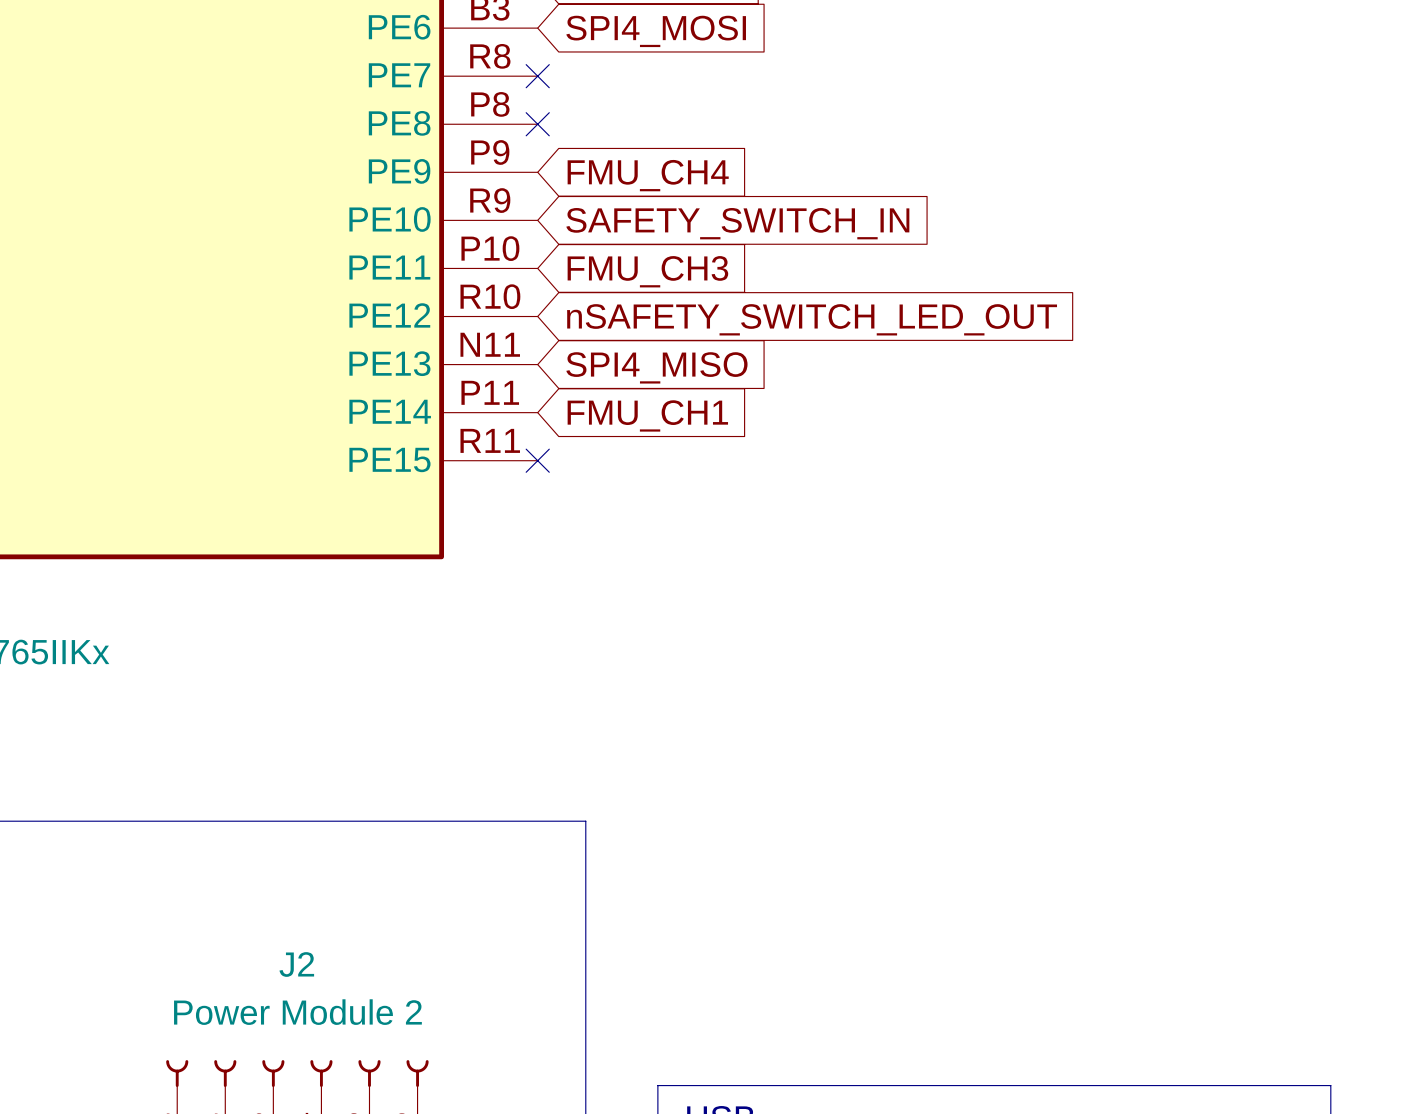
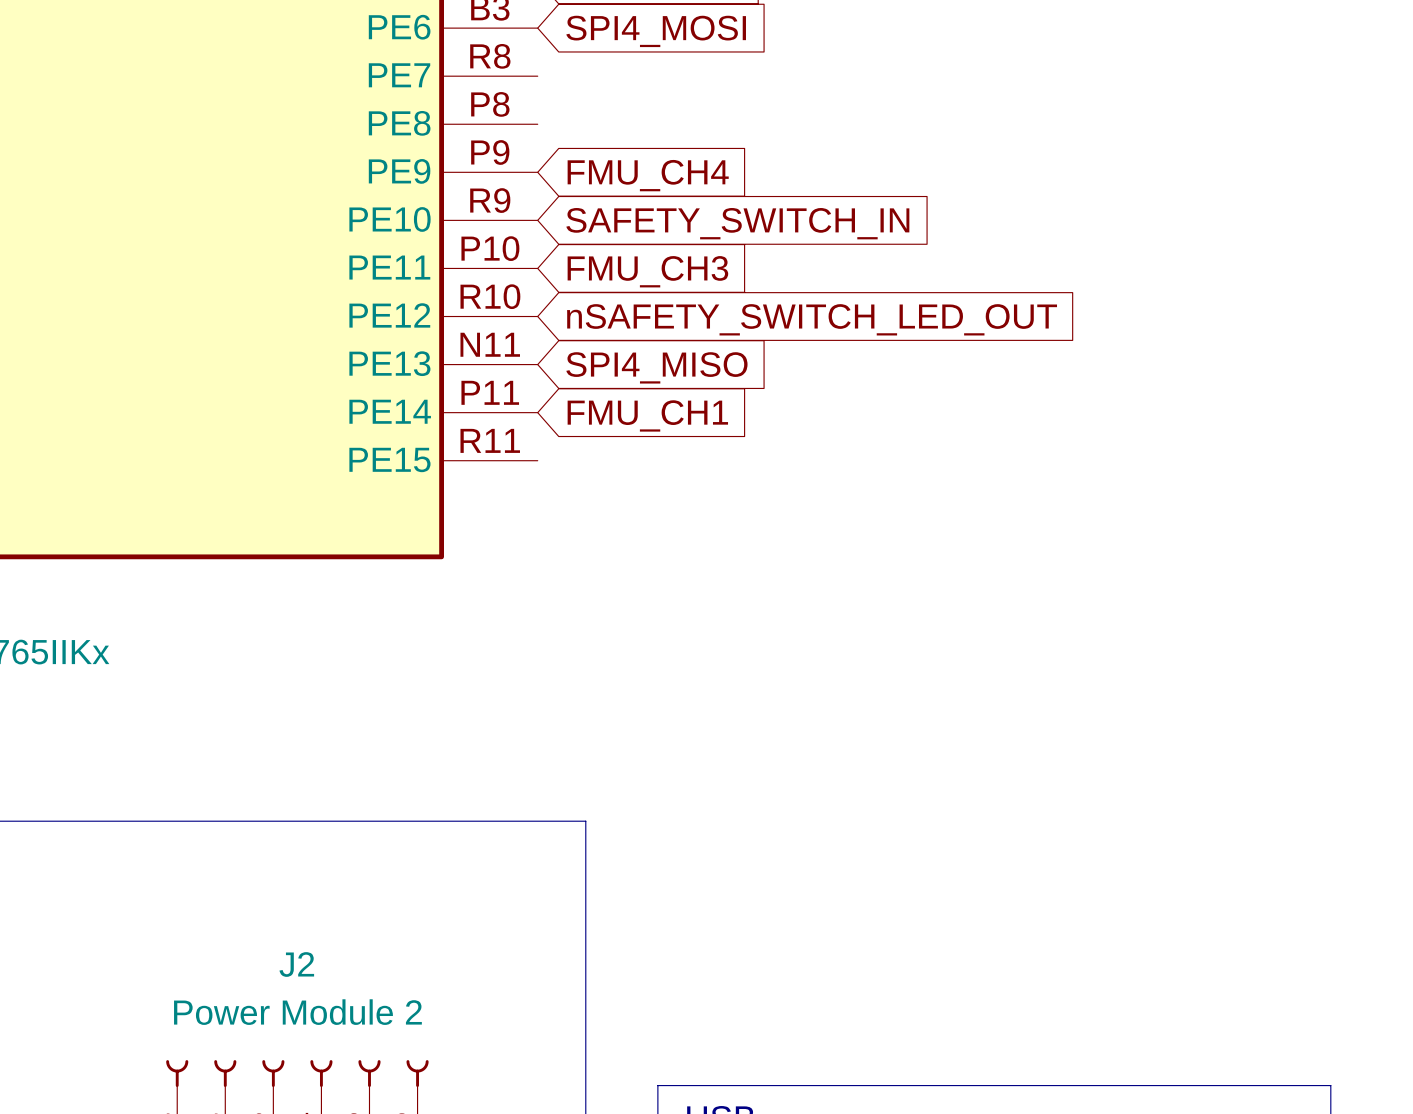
no-connect mark: (537, 76) -> none
no-connect mark: (537, 124) -> none
no-connect mark: (537, 460) -> none

